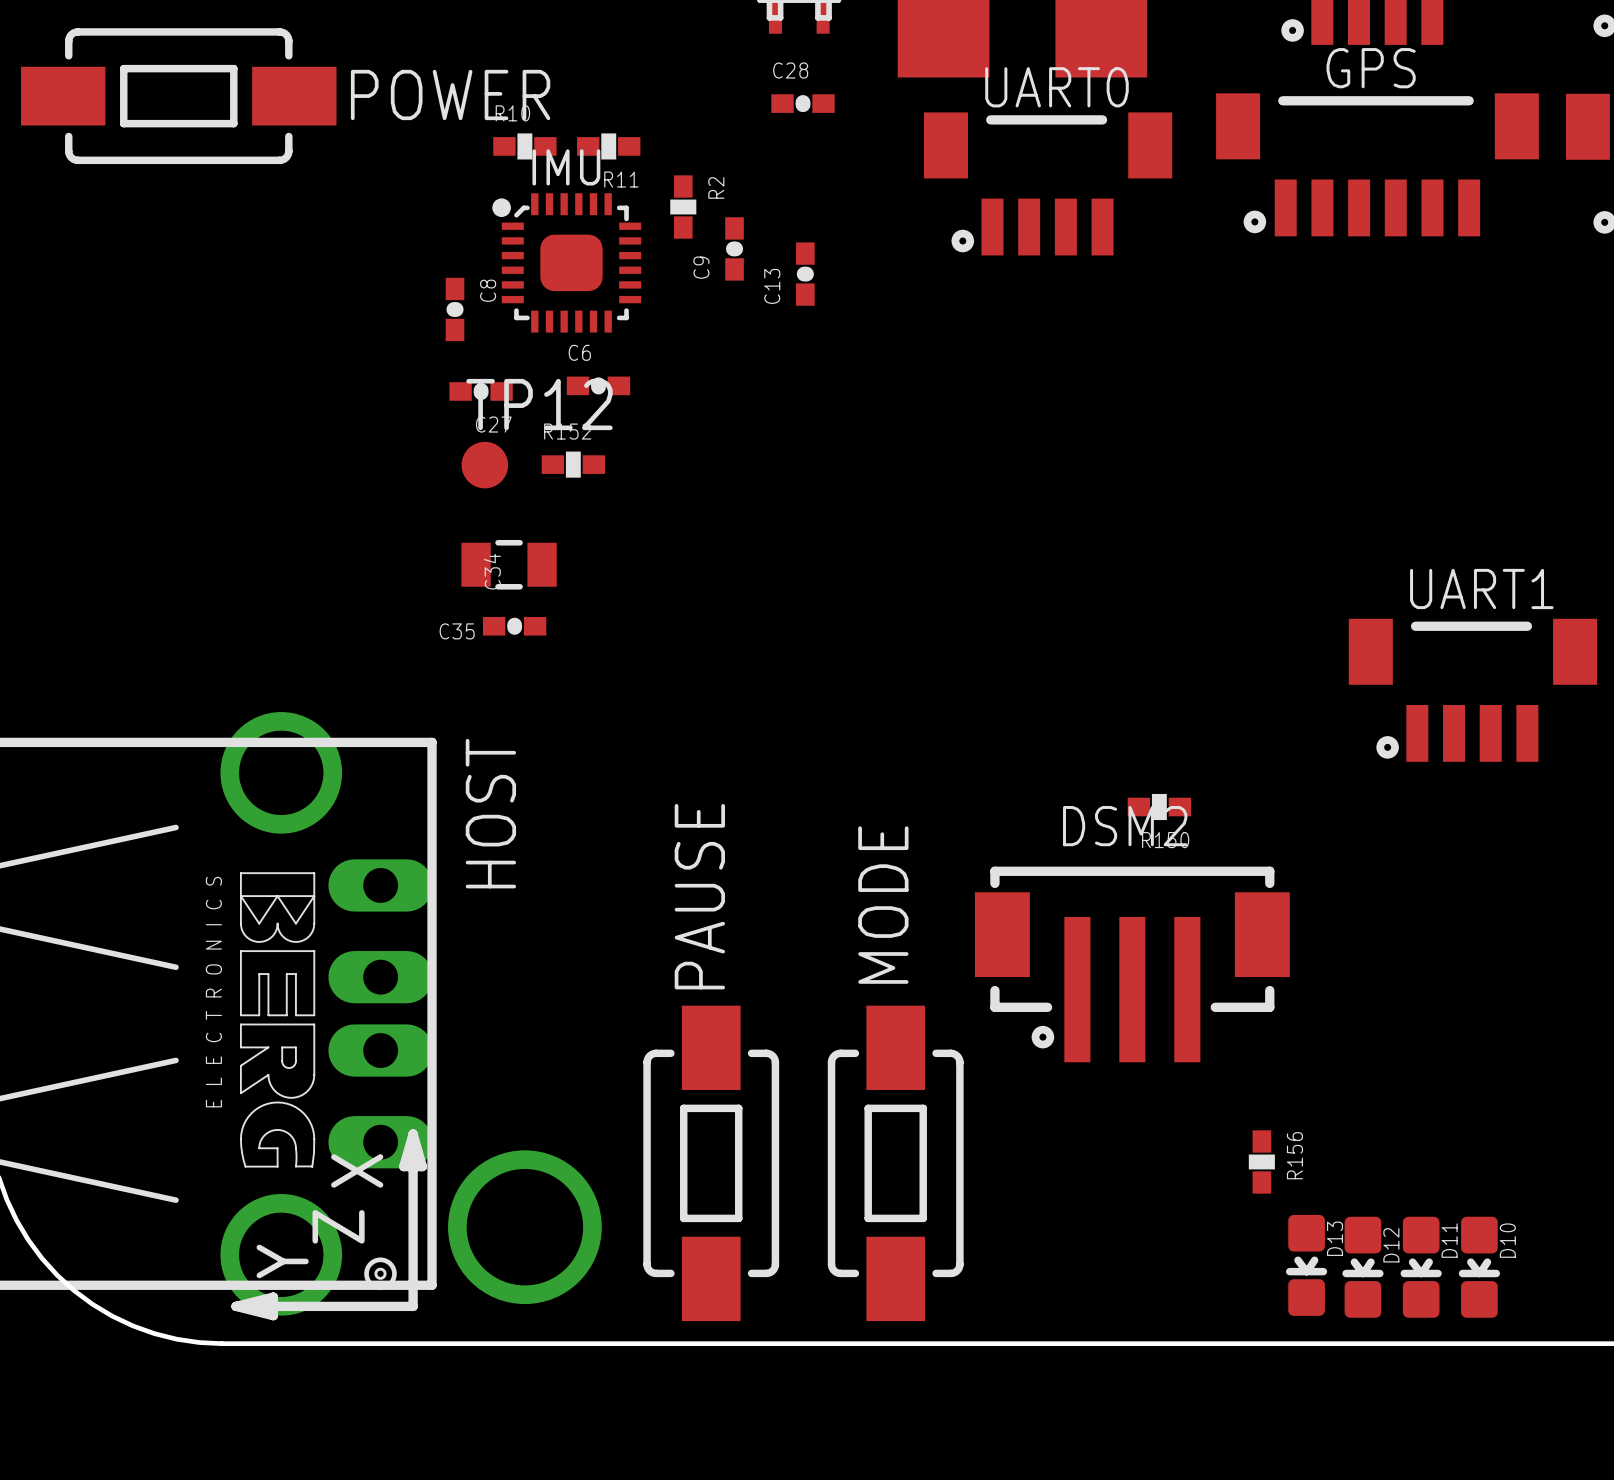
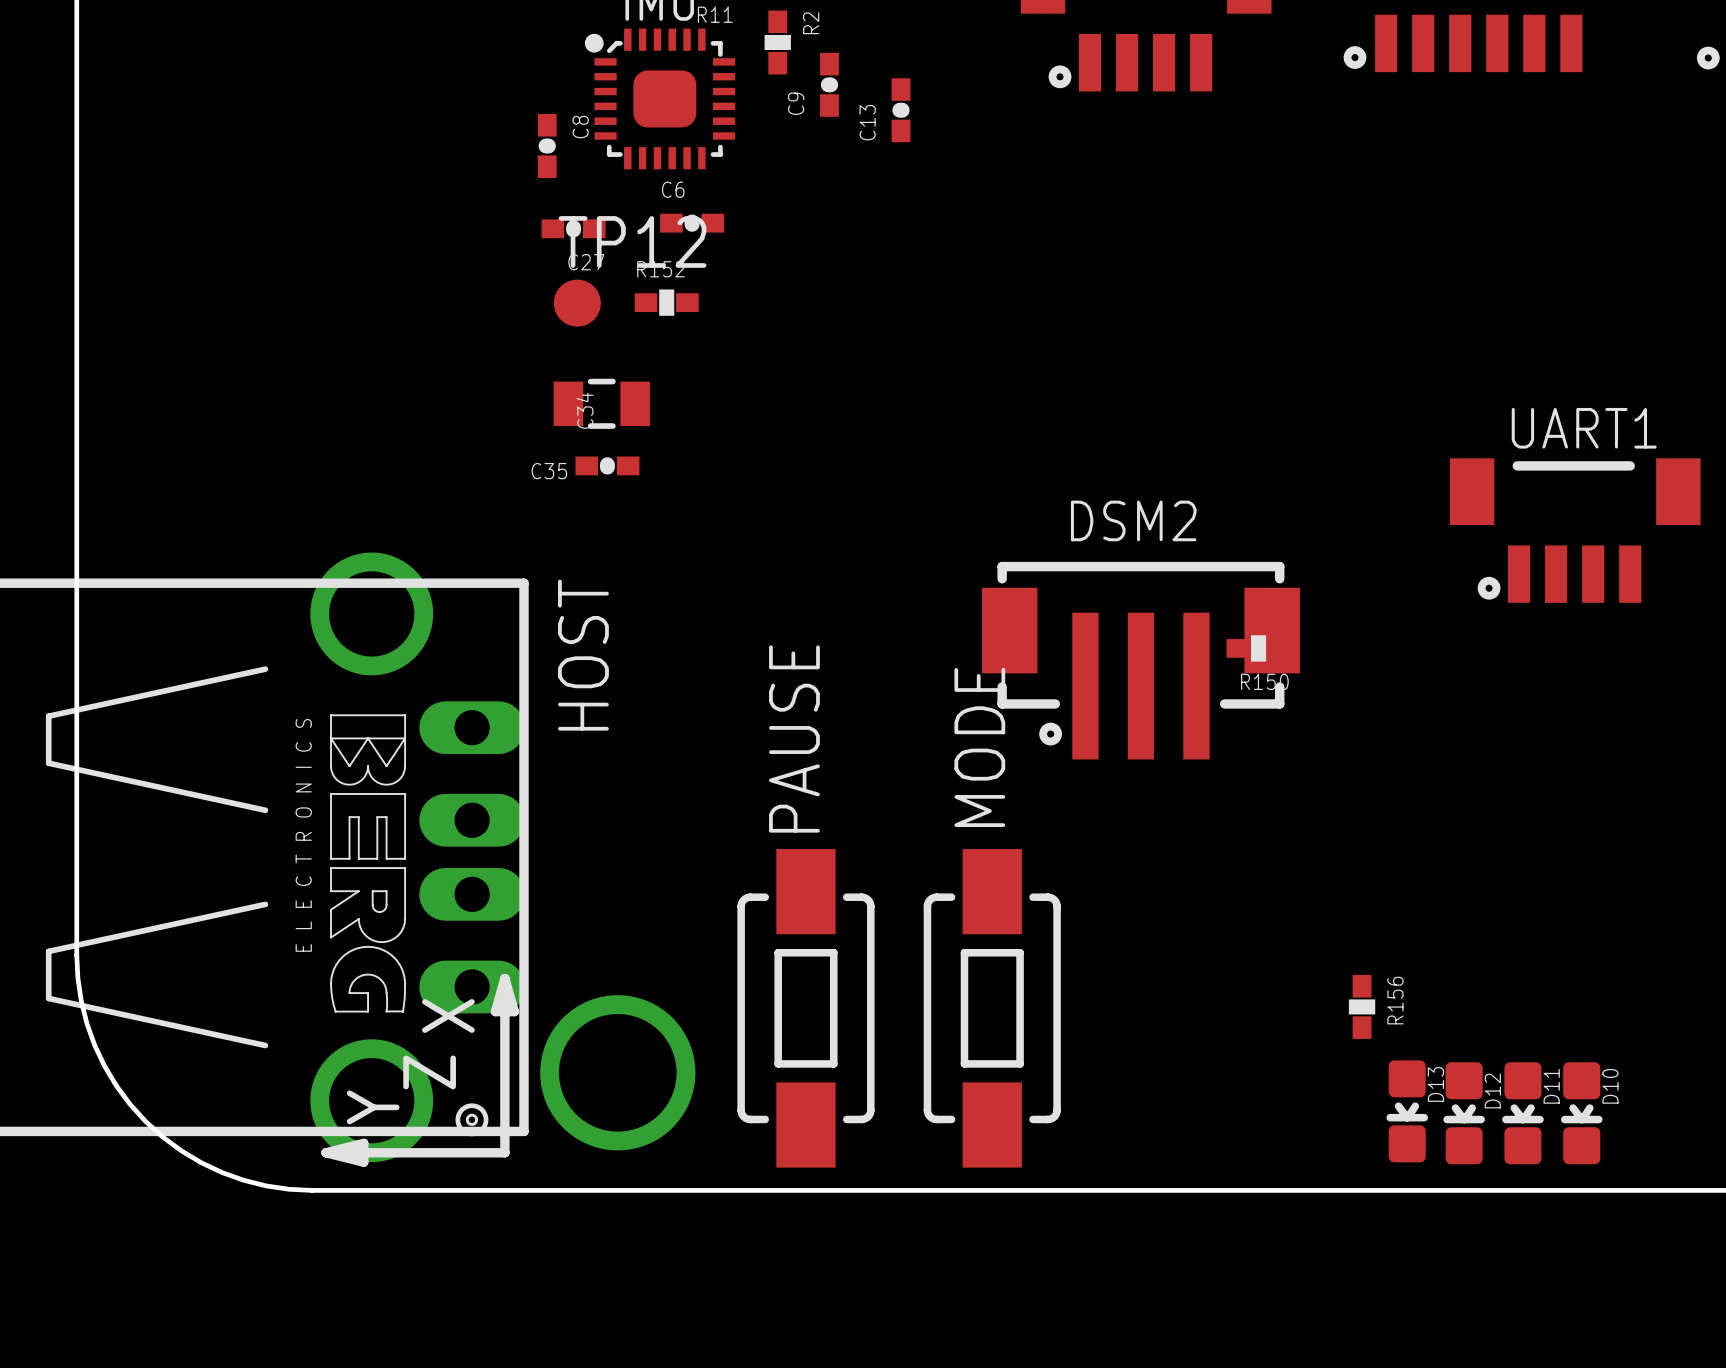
DSM2 position: (1132, 964) -> (1140, 660)

